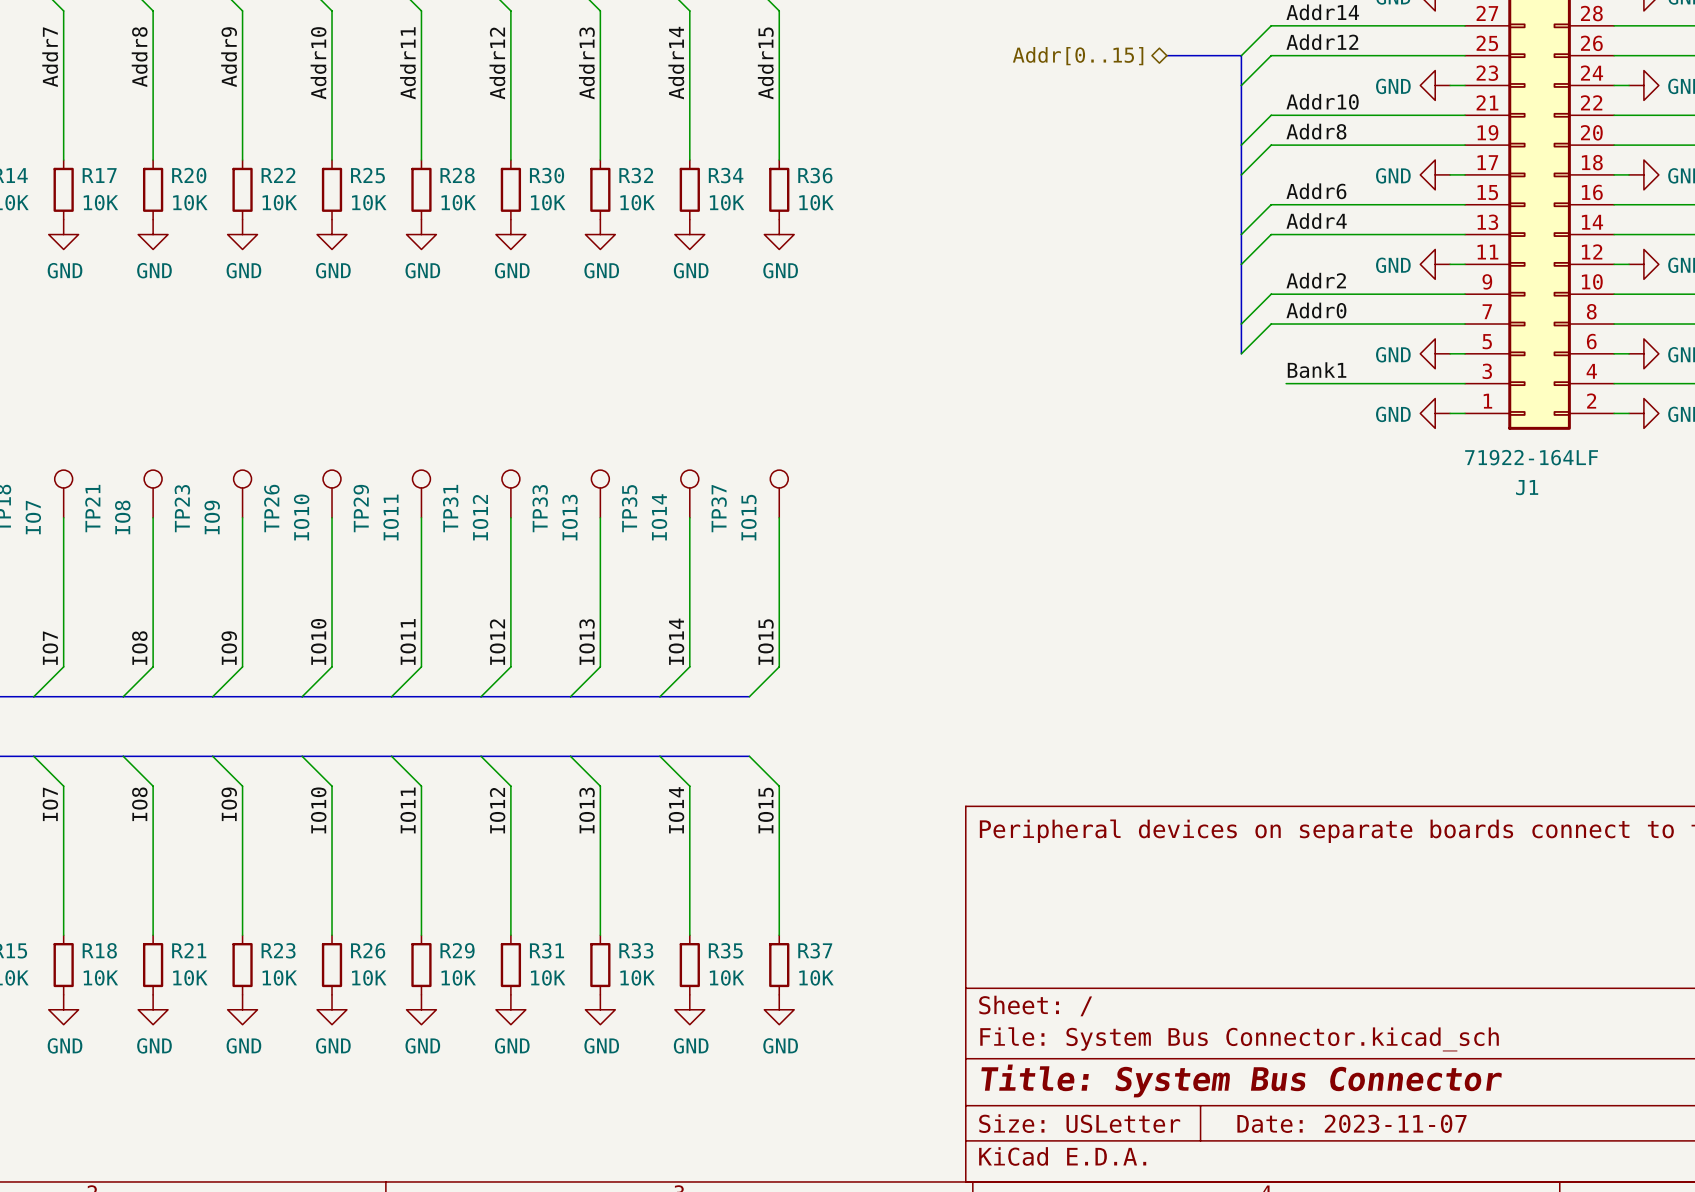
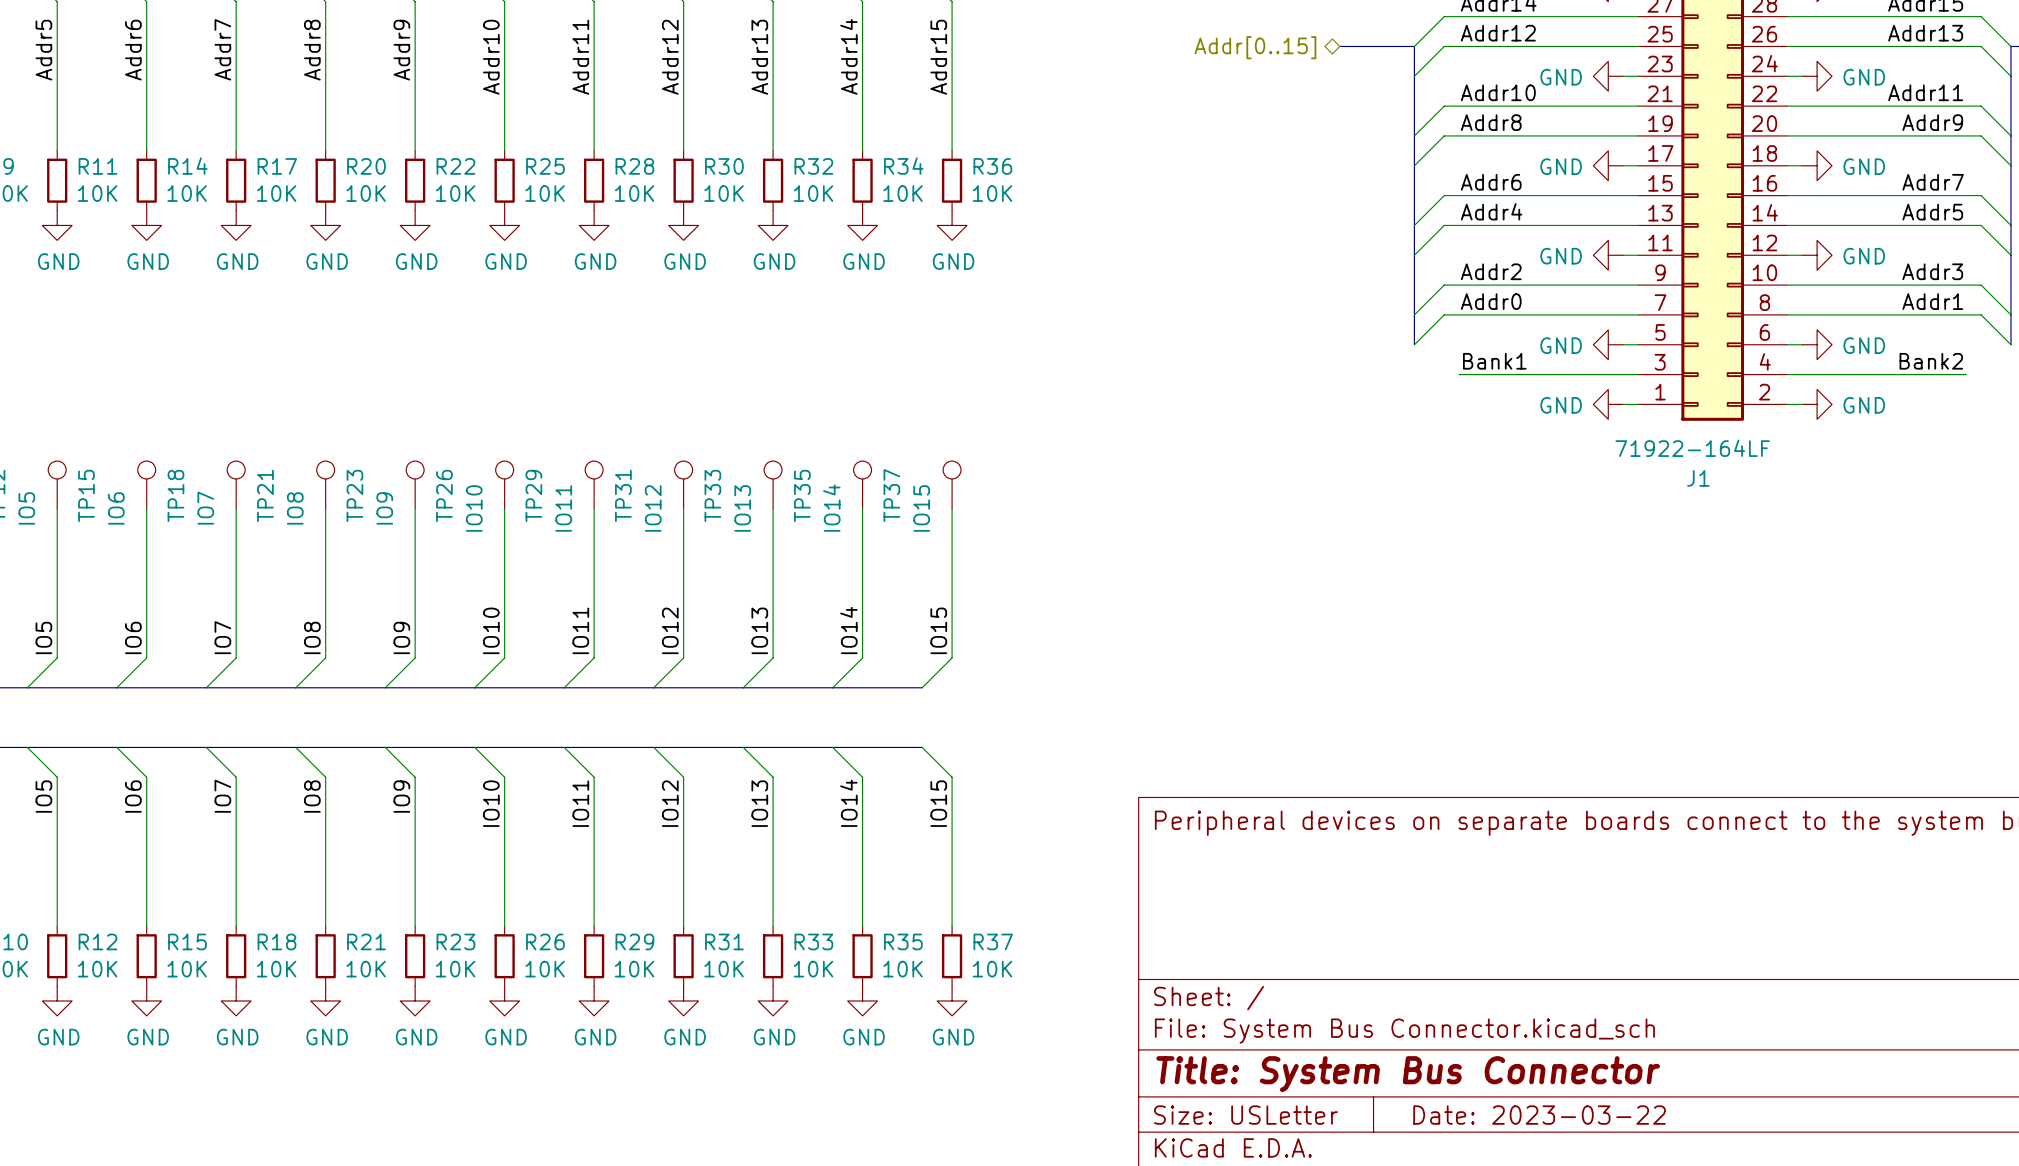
title block: Date: 2023-11-07 (1351, 1123) -> Date: 2023-03-22 (1539, 1115)

